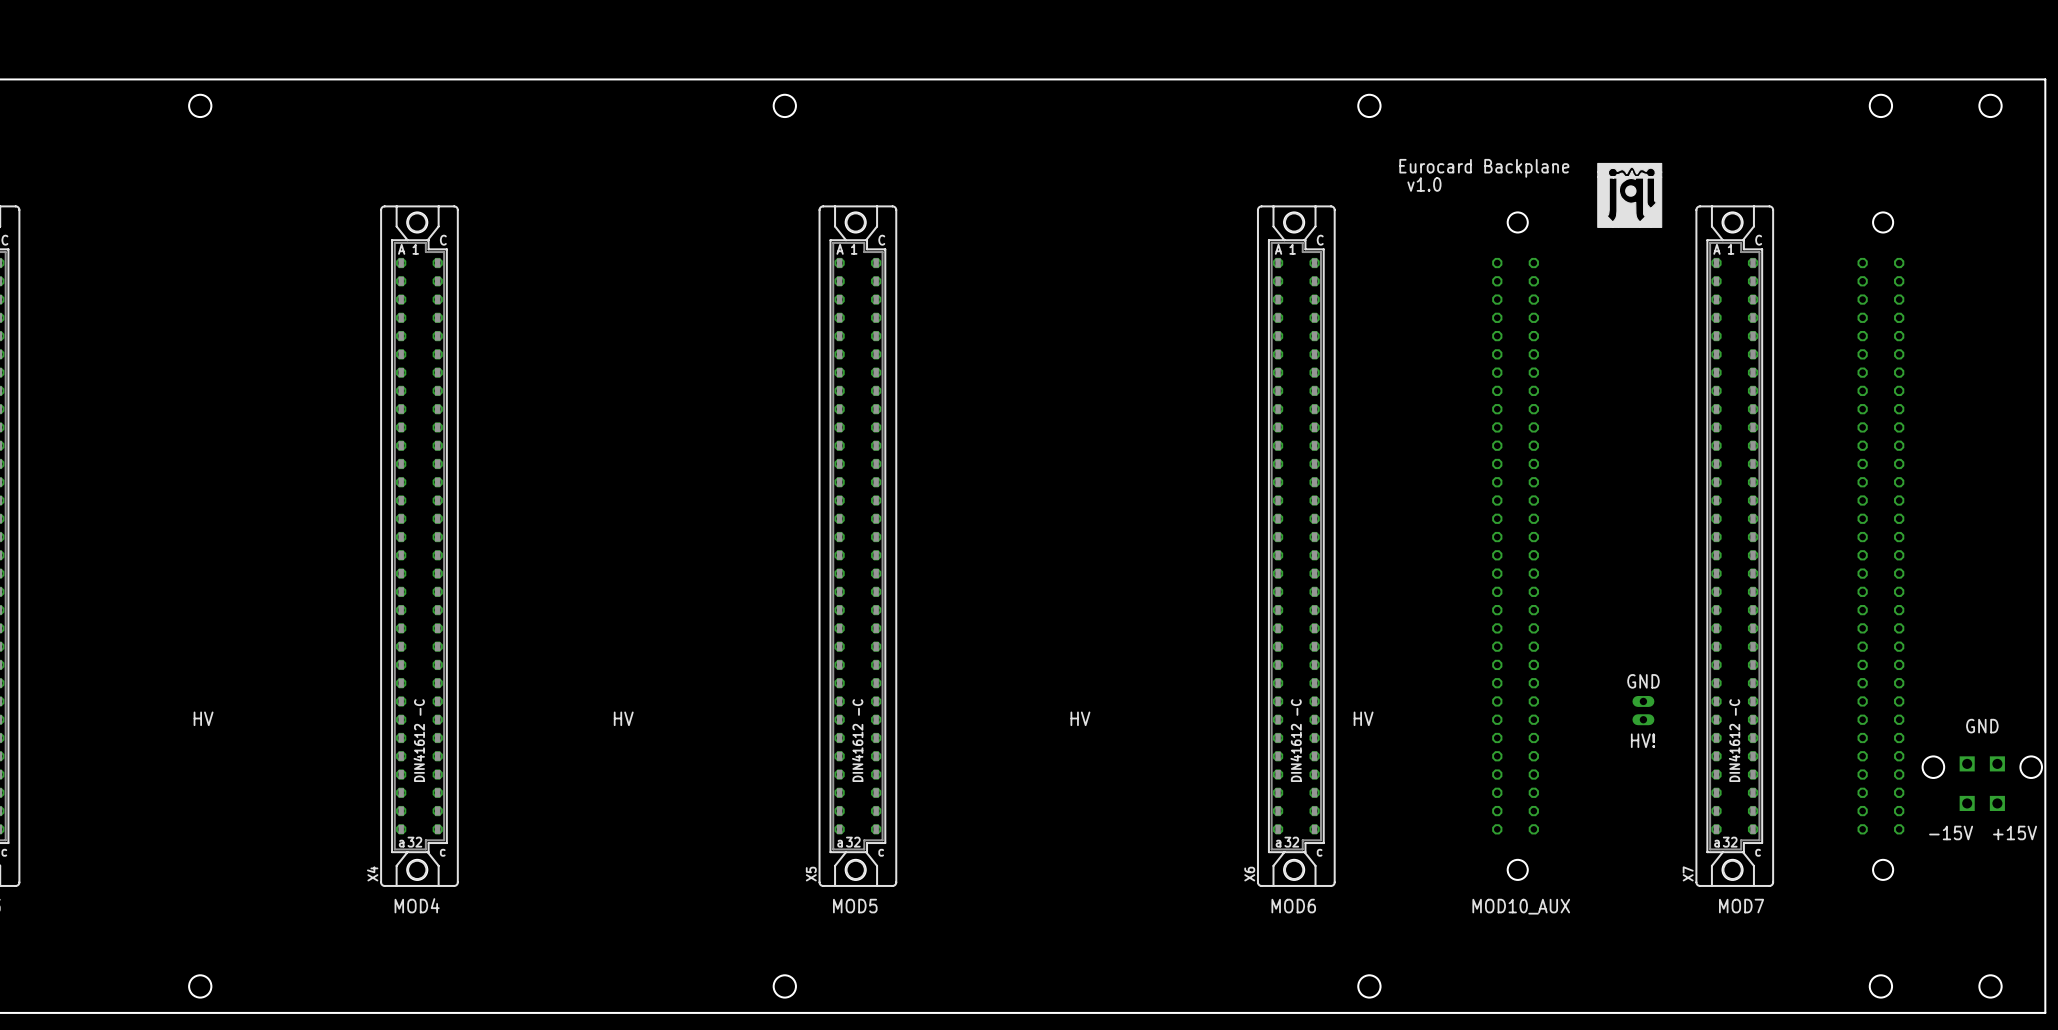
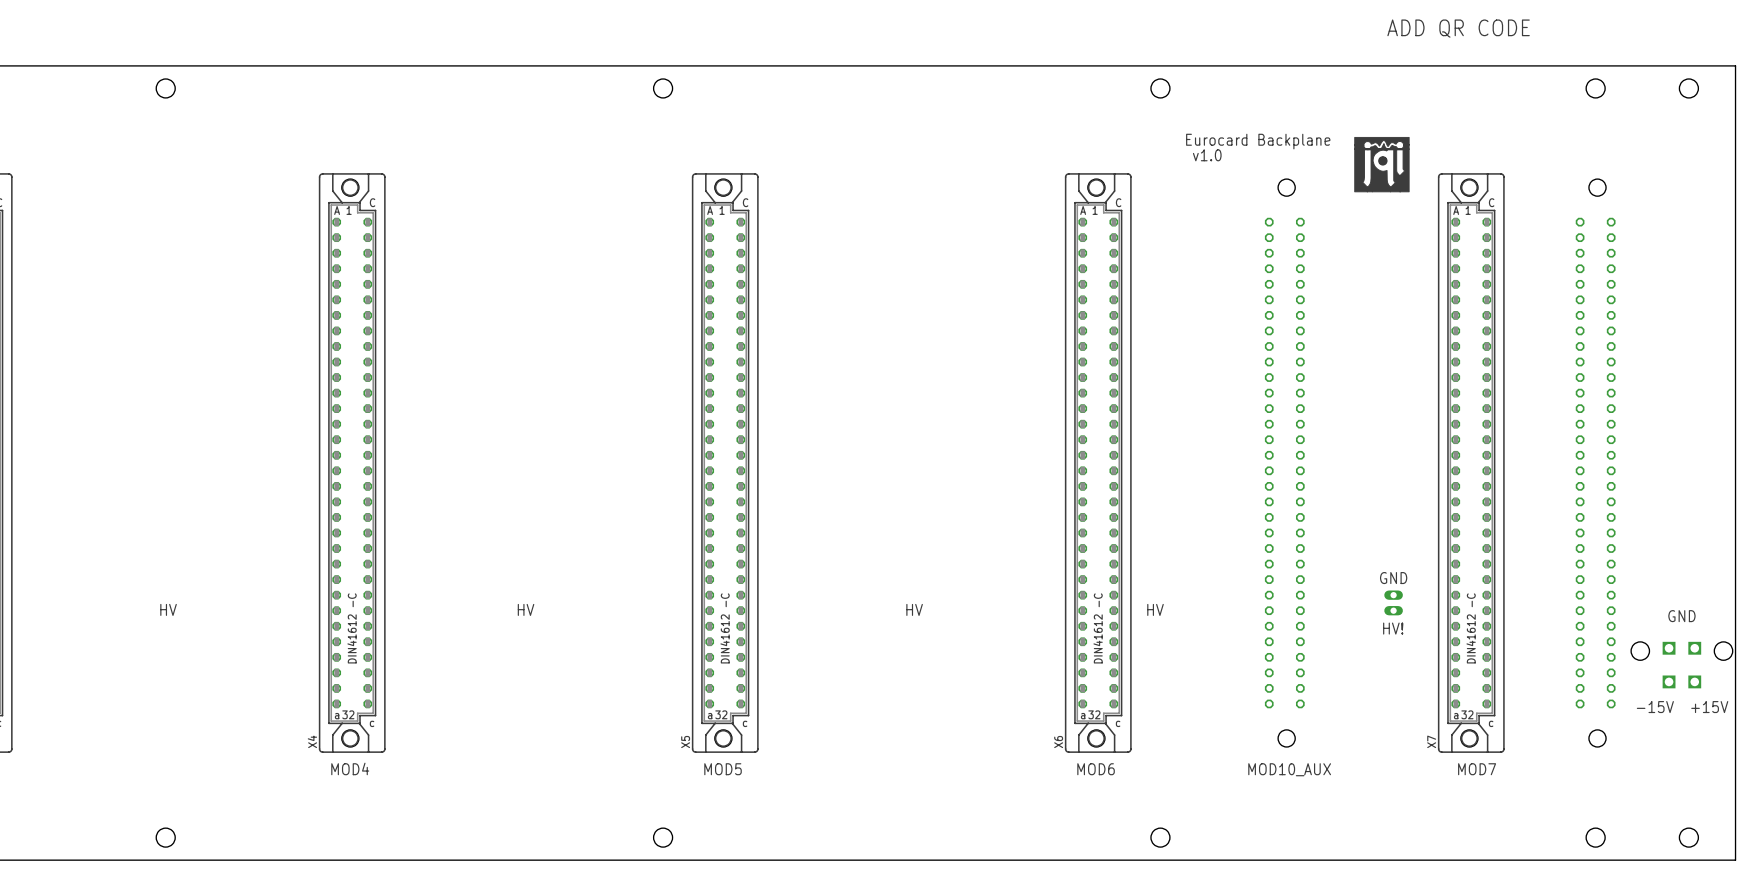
text: none -> ADD QR CODE (1458, 28)

